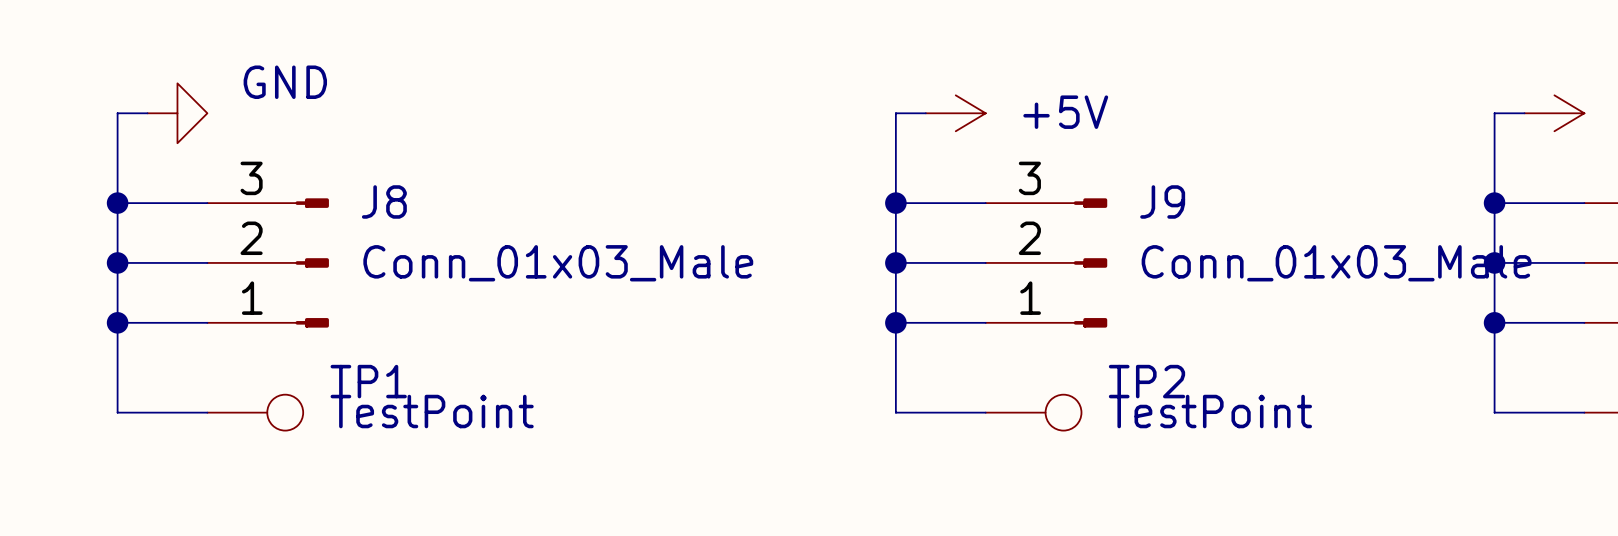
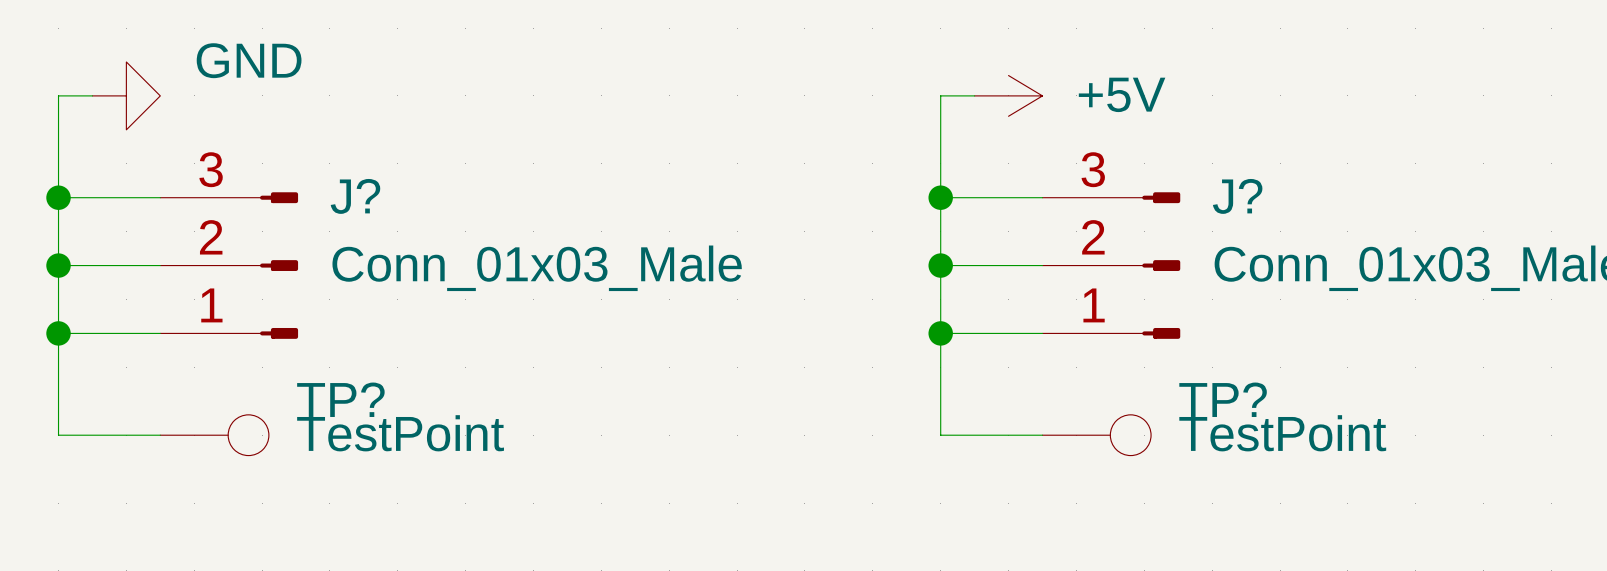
J8 name: J8 (384, 201) -> J? (355, 196)
J9 name: J9 (1162, 201) -> J? (1237, 196)
TP1 name: TP1 (368, 381) -> TP? (340, 399)
TP2 name: TP2 (1146, 381) -> TP? (1223, 399)

